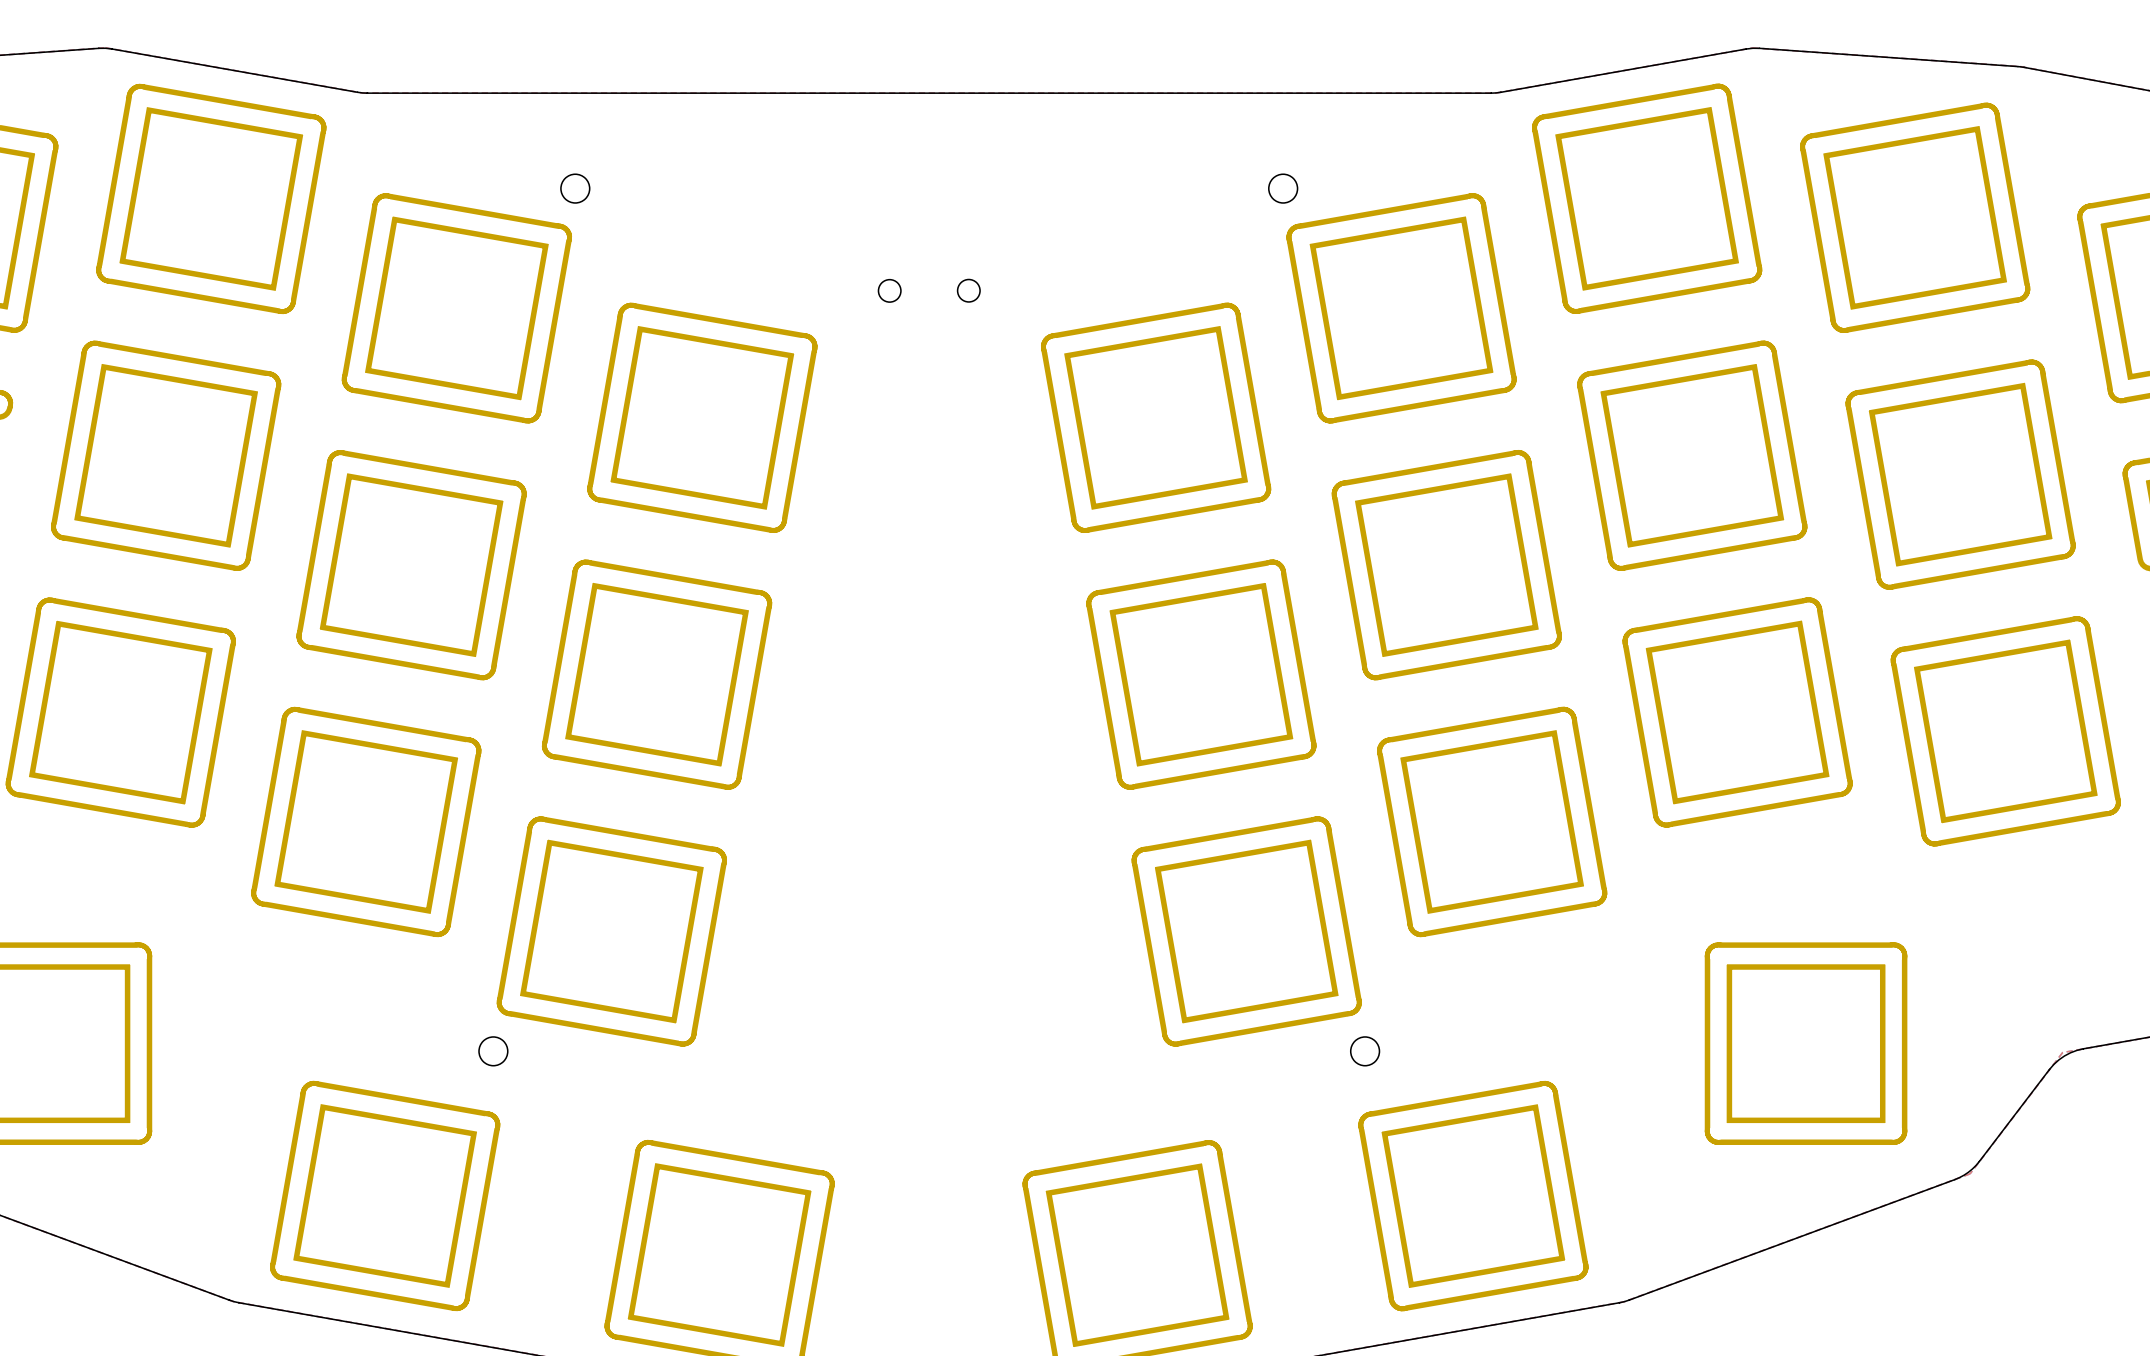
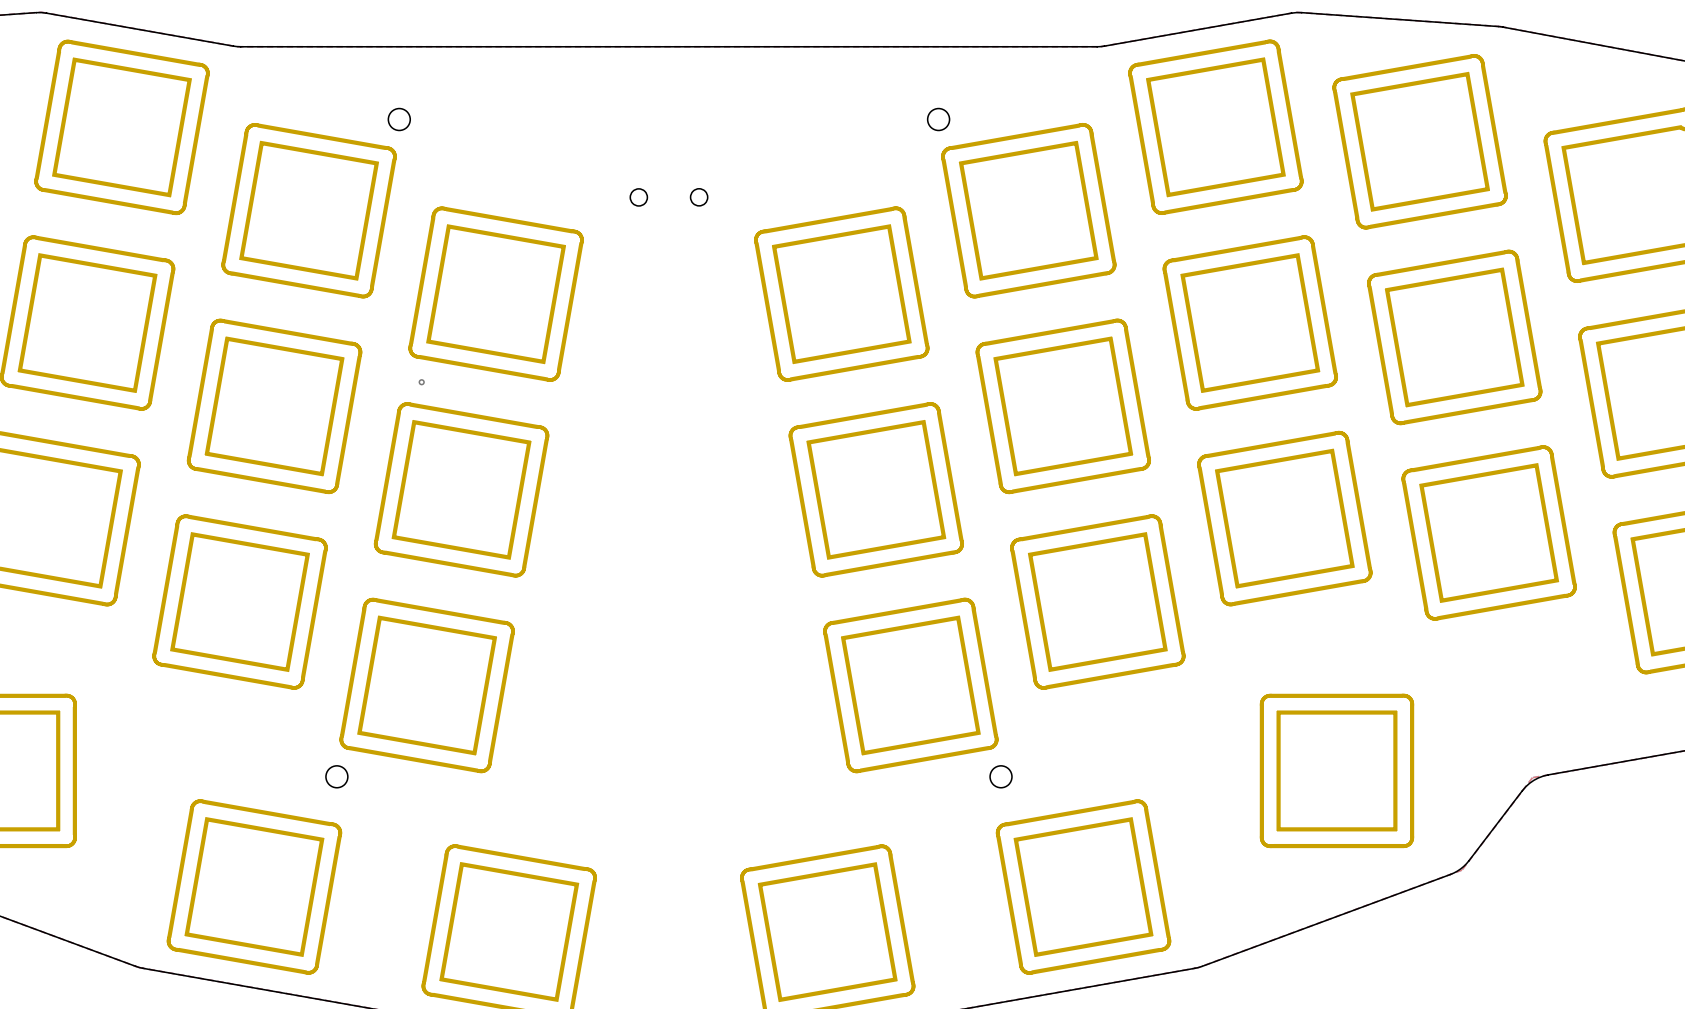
via: none -> (421, 382)

